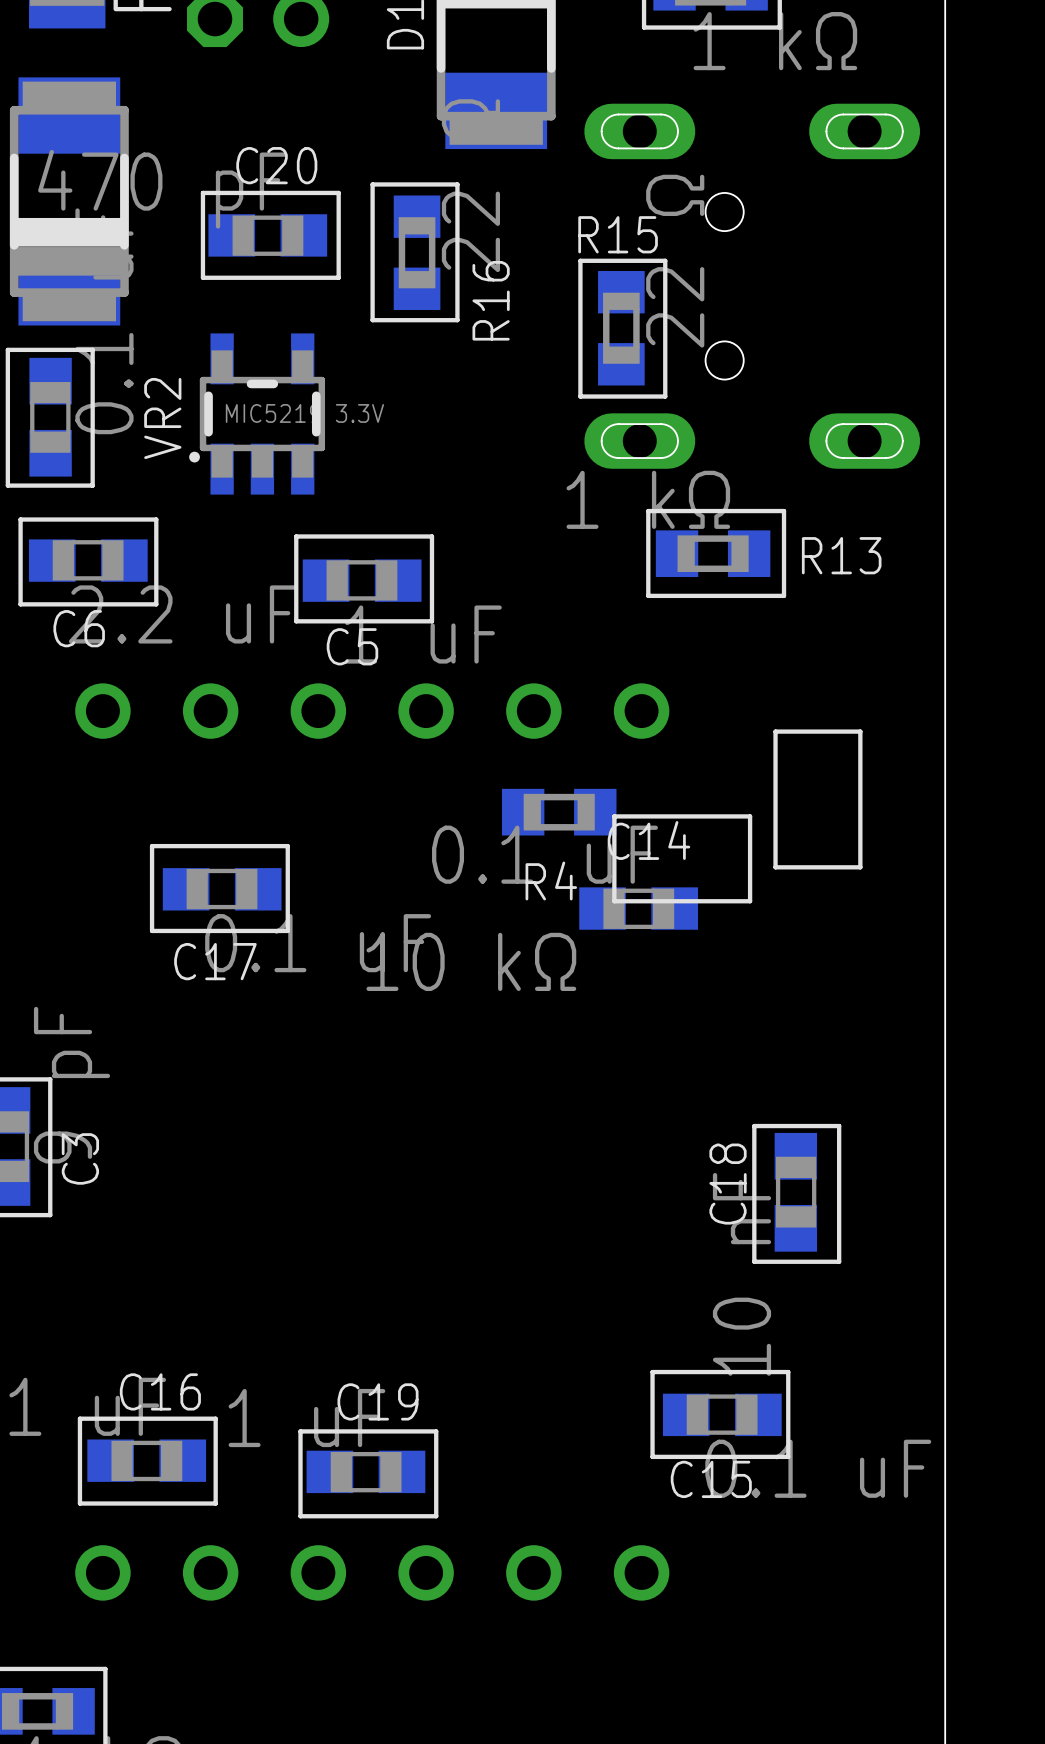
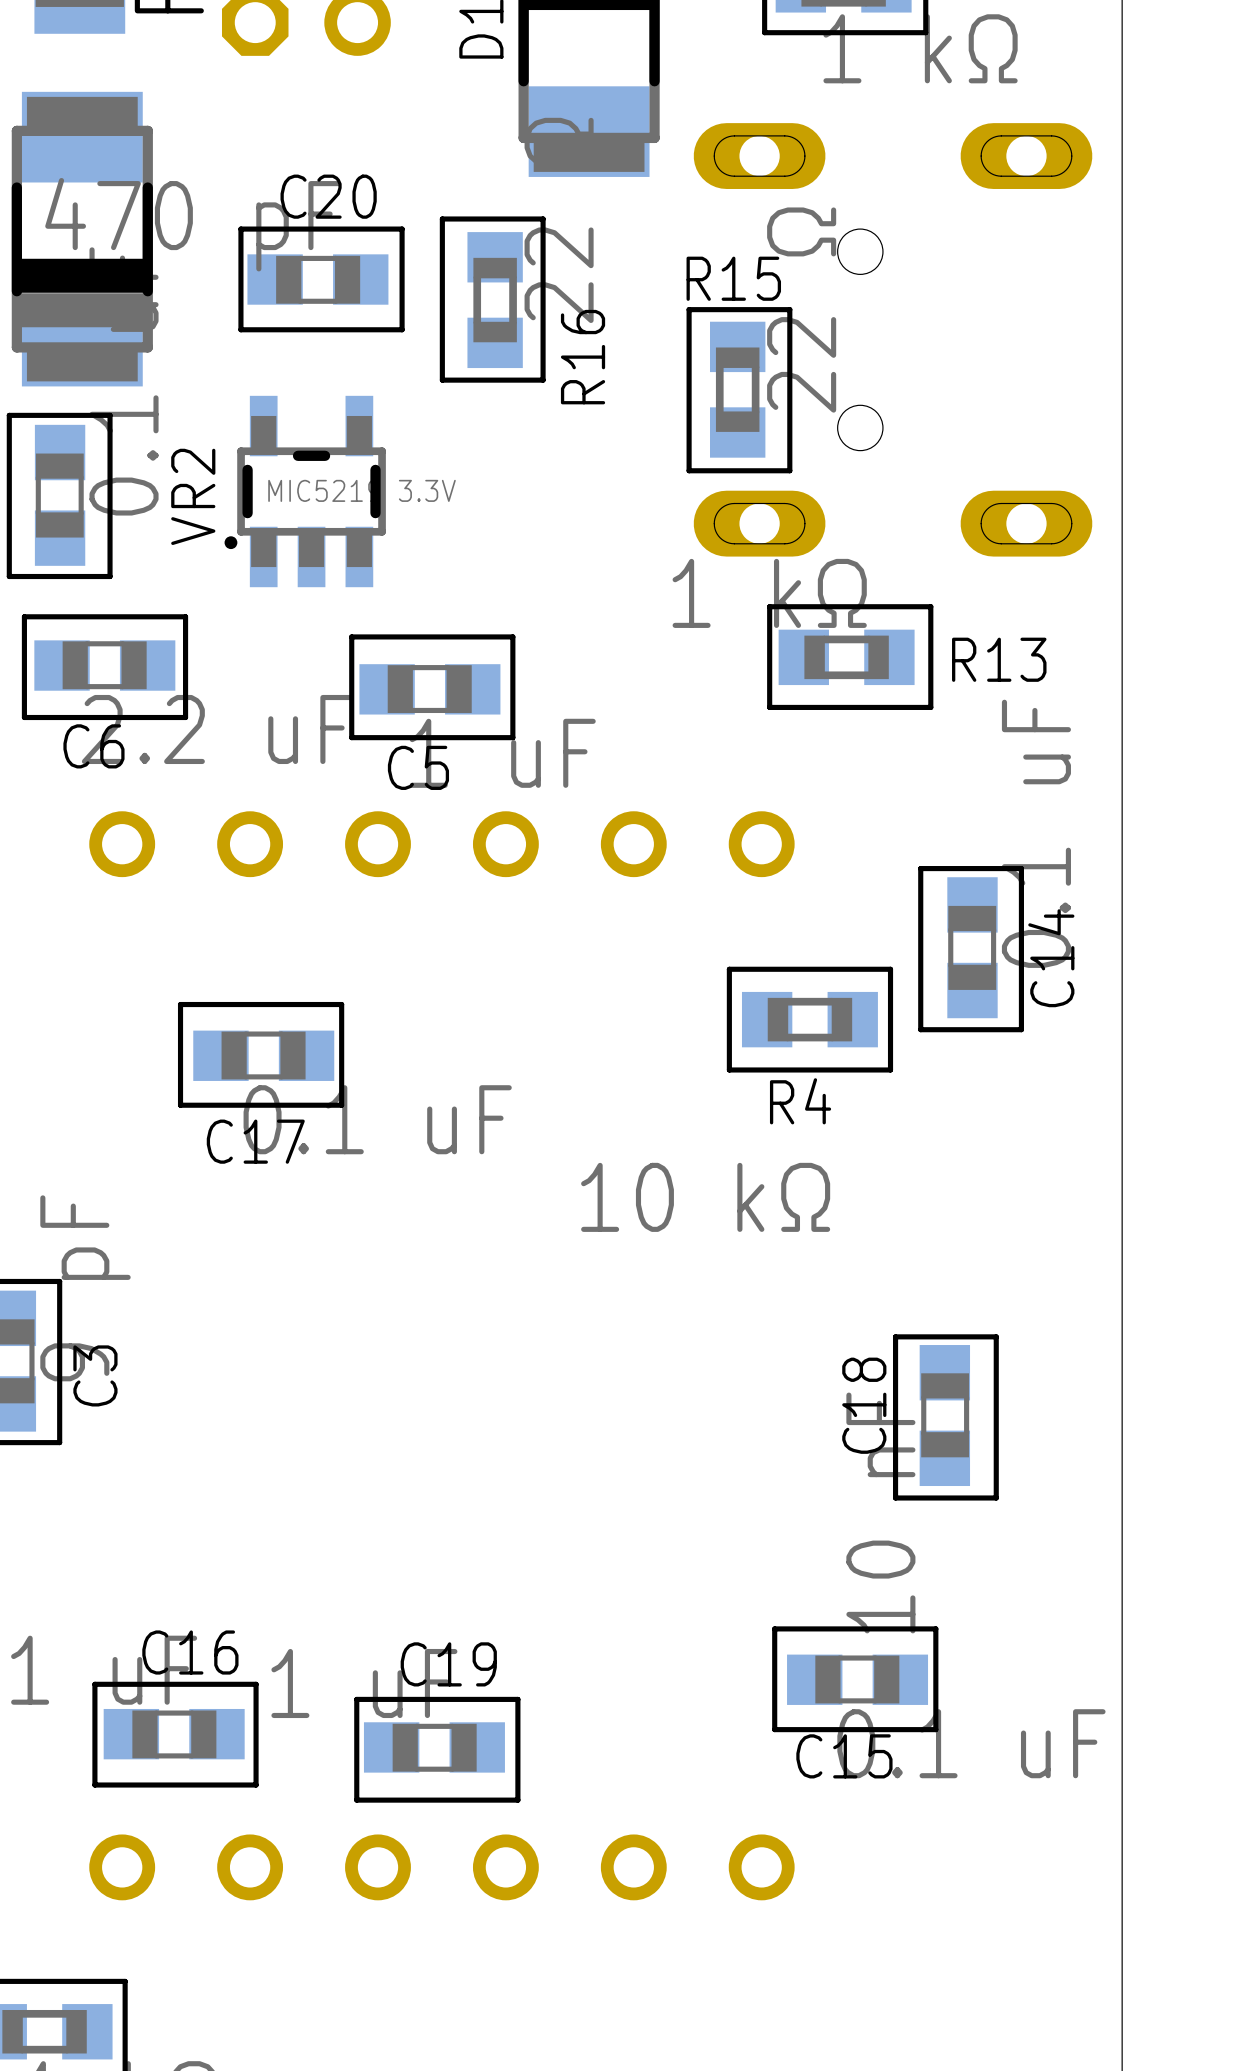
R4 position: (559, 812) -> (809, 1019)
C14 rotation: 0° (638, 908) -> 90° clockwise (972, 947)
C14 position: (638, 908) -> (972, 947)

